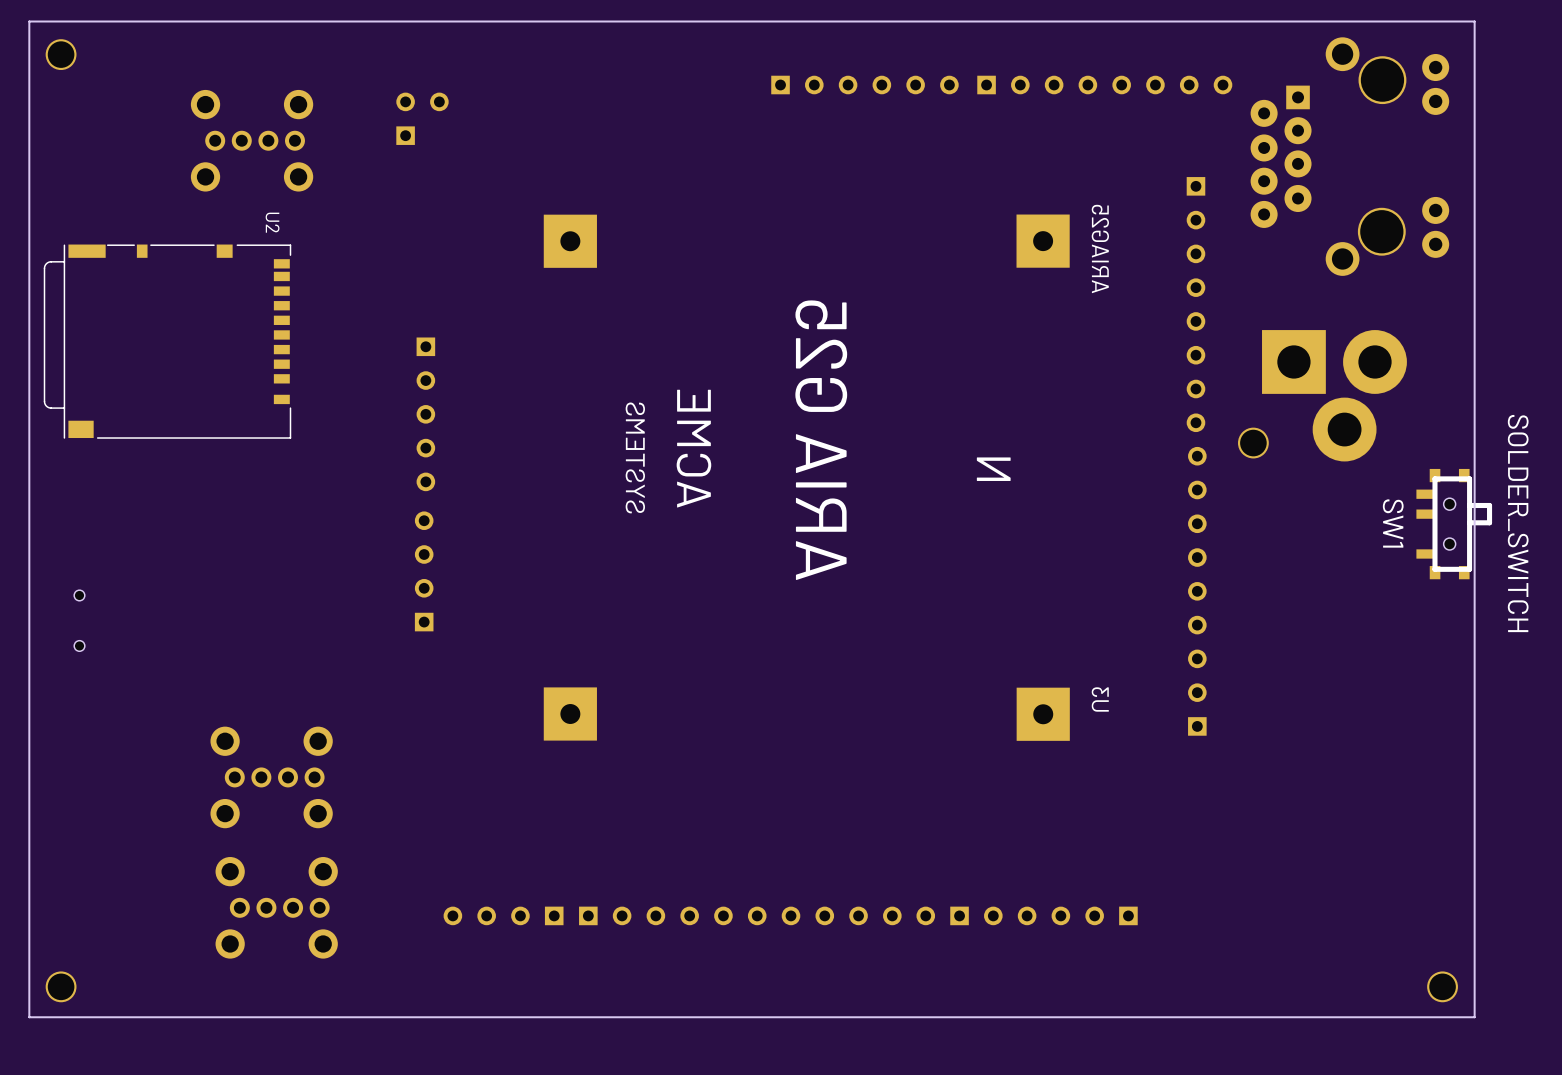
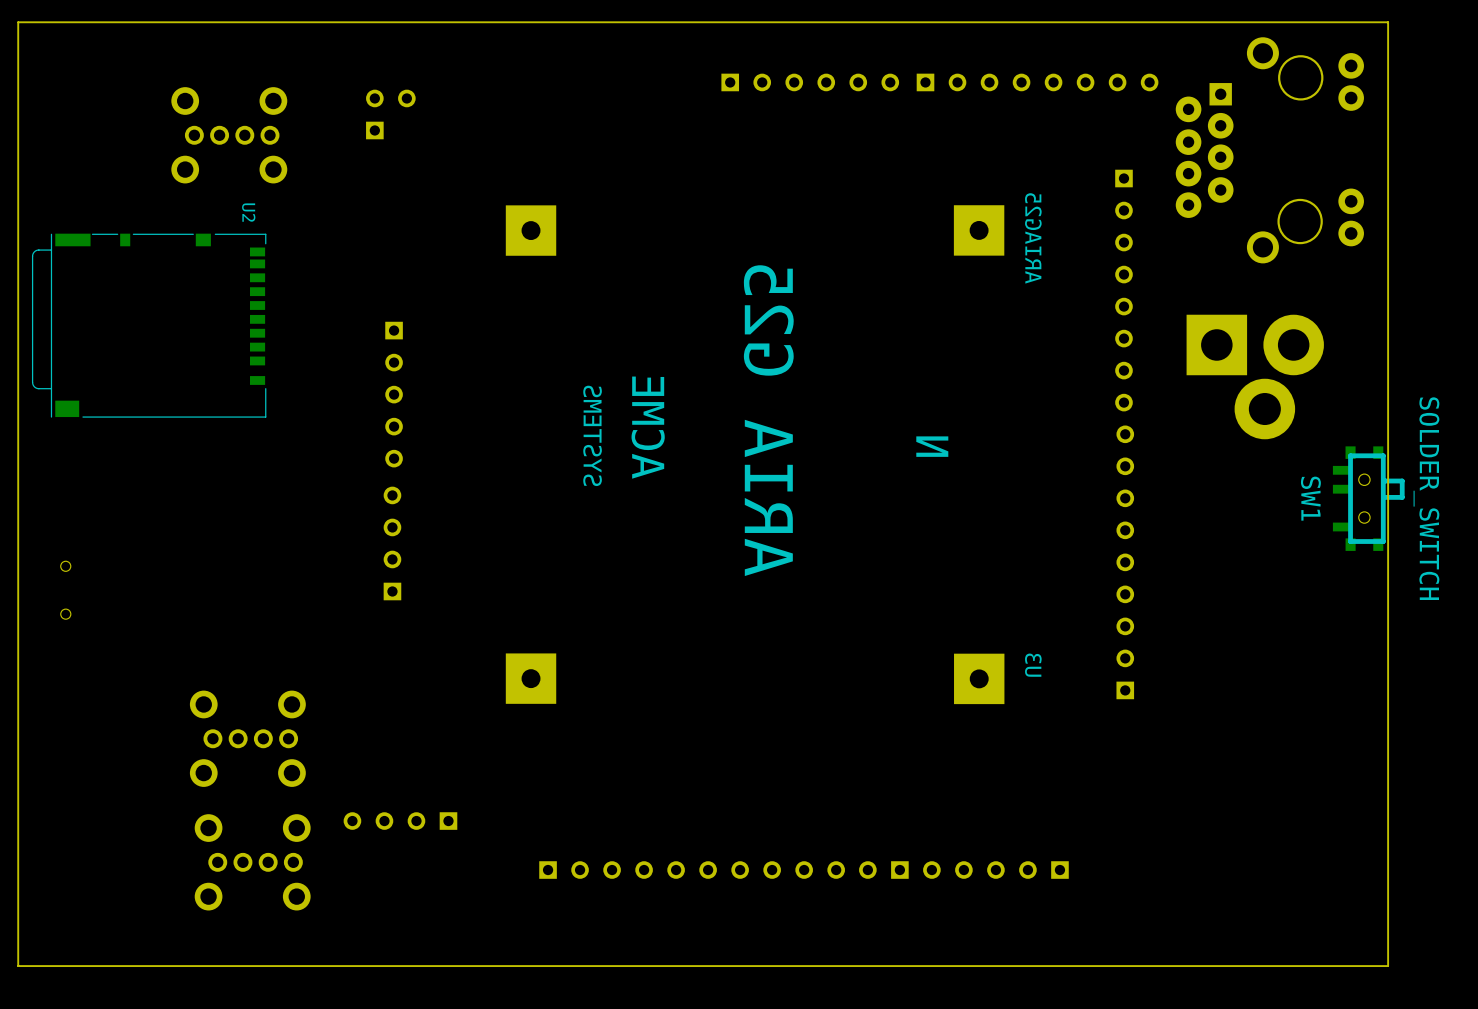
part: (61, 54) -> none
part: (1253, 443) -> none
part position: (503, 915) -> (400, 821)
part: (61, 986) -> none
part: (1442, 986) -> none

